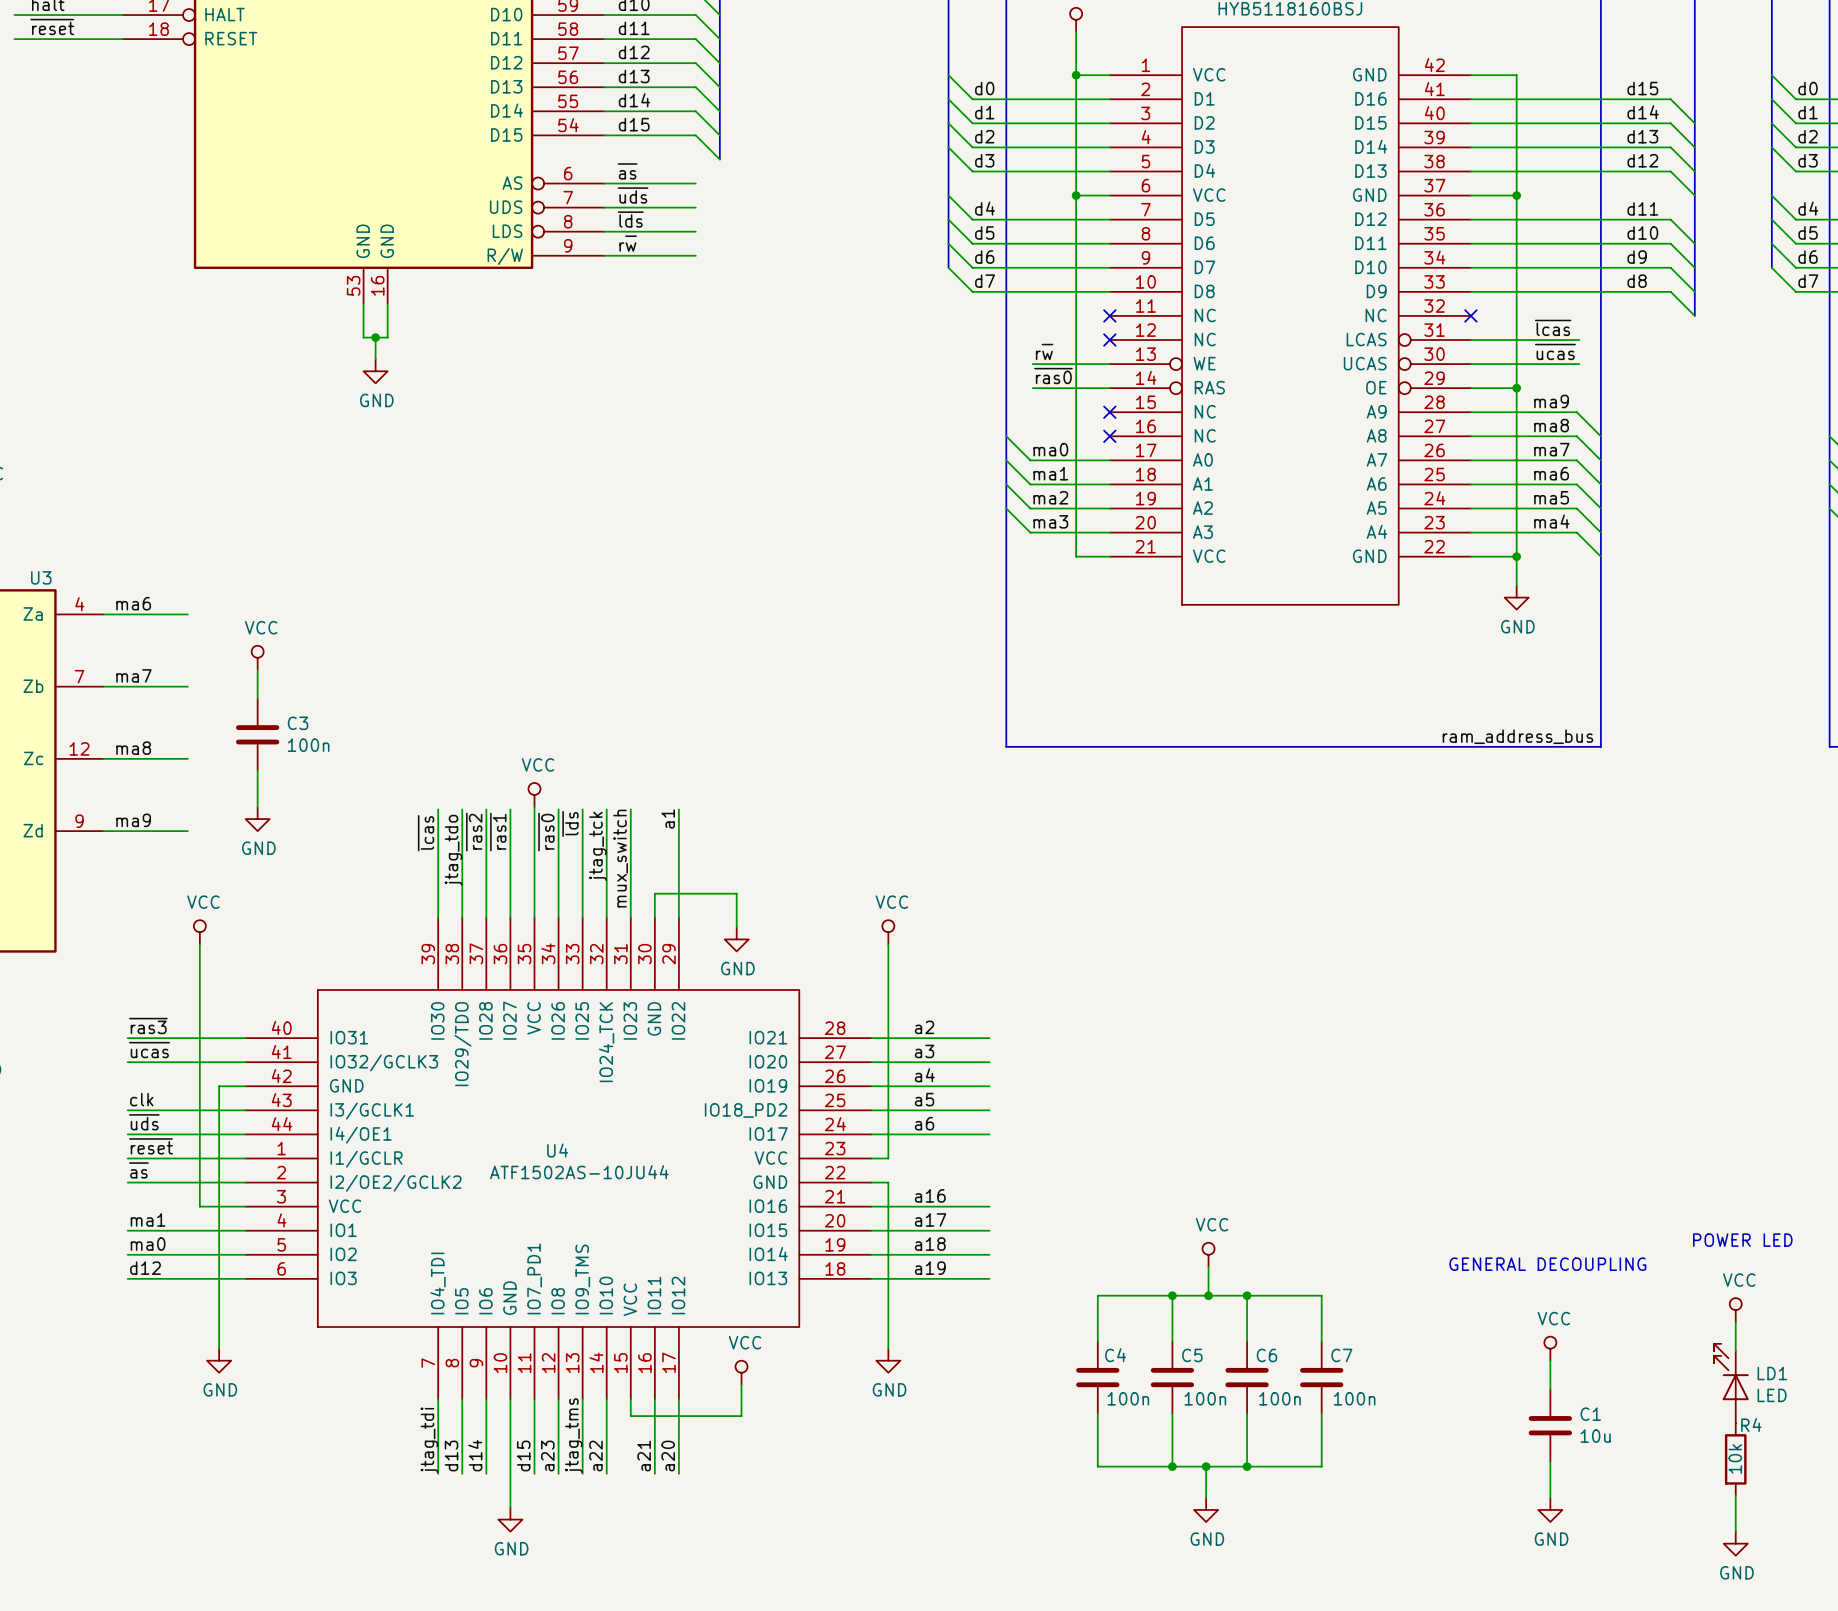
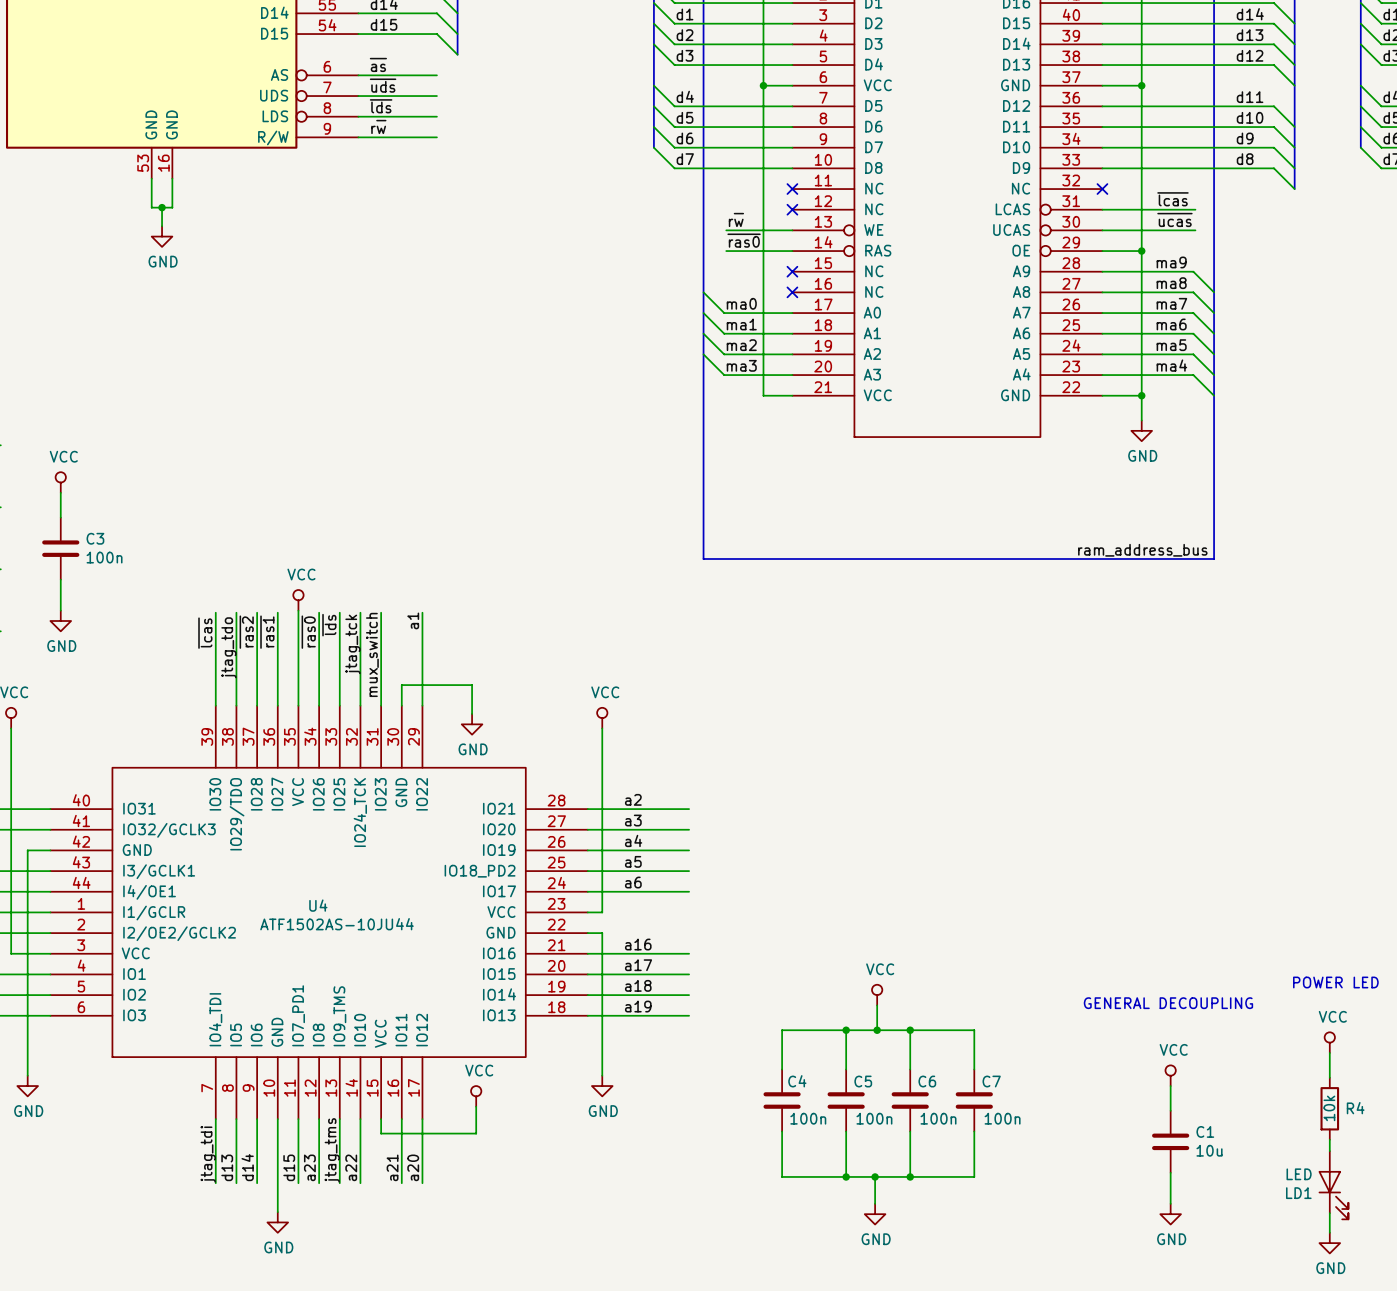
LD1 rotation: 0° (1731, 1372) -> 180° (1333, 1195)
LD1 position: (1731, 1383) -> (1333, 1185)
R4 name position: R4 (1751, 1424) -> R4 (1355, 1108)
R4 position: (1735, 1459) -> (1329, 1108)

